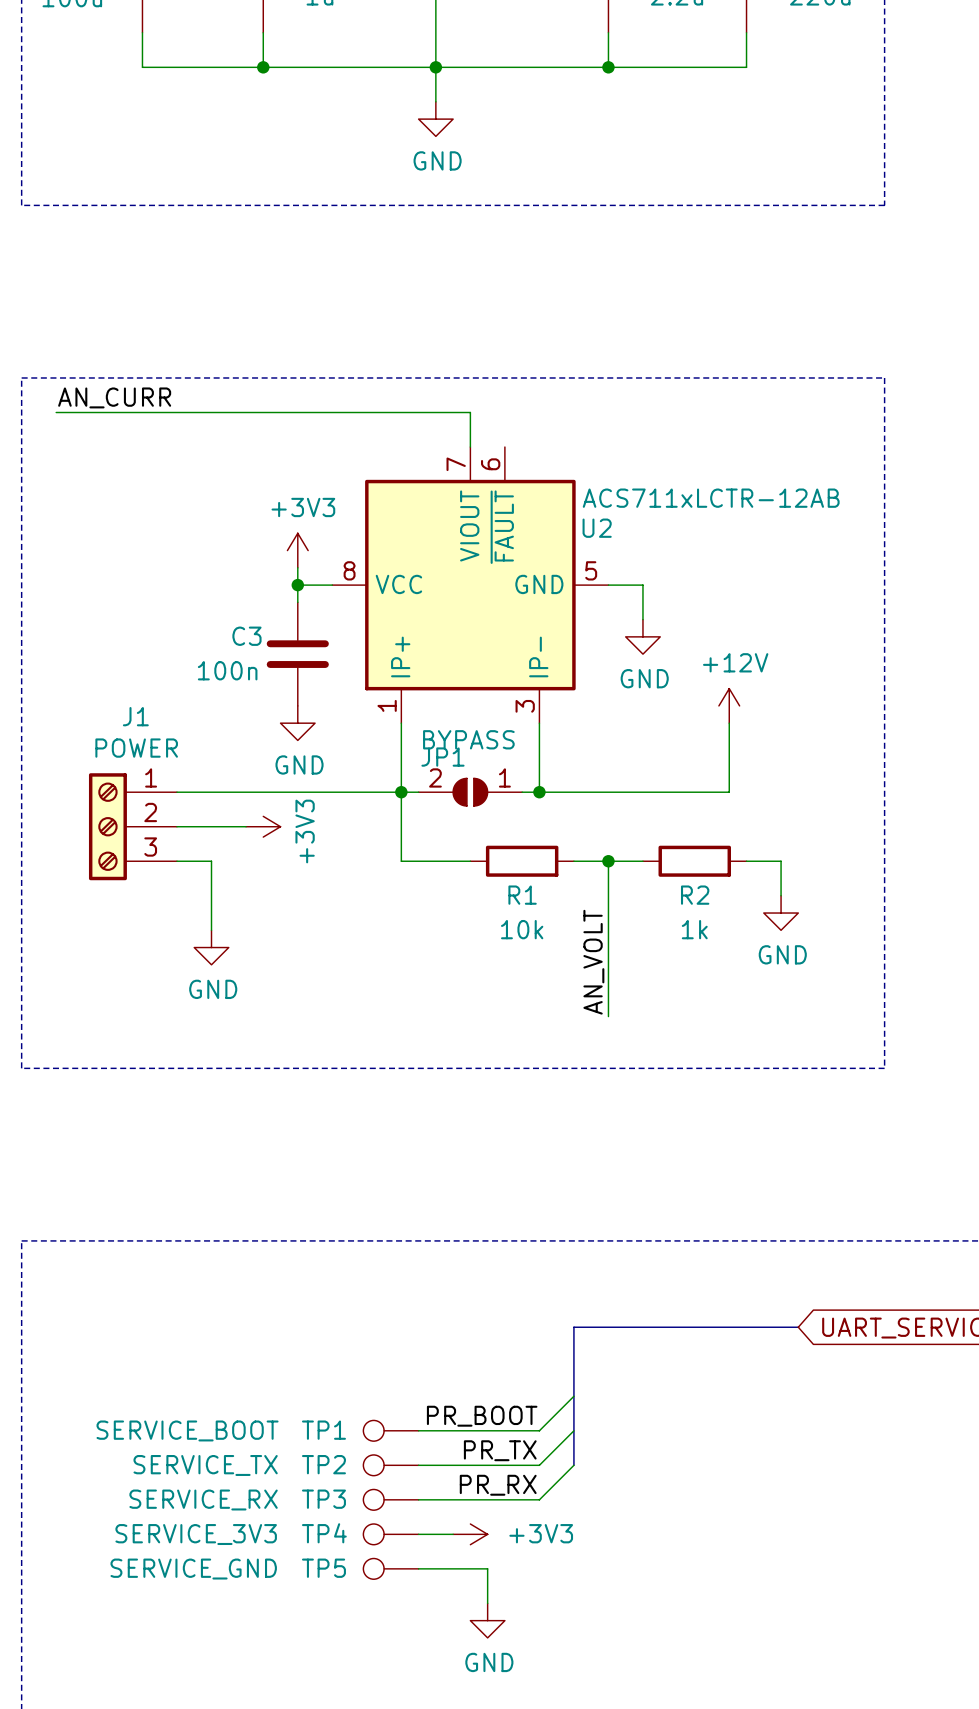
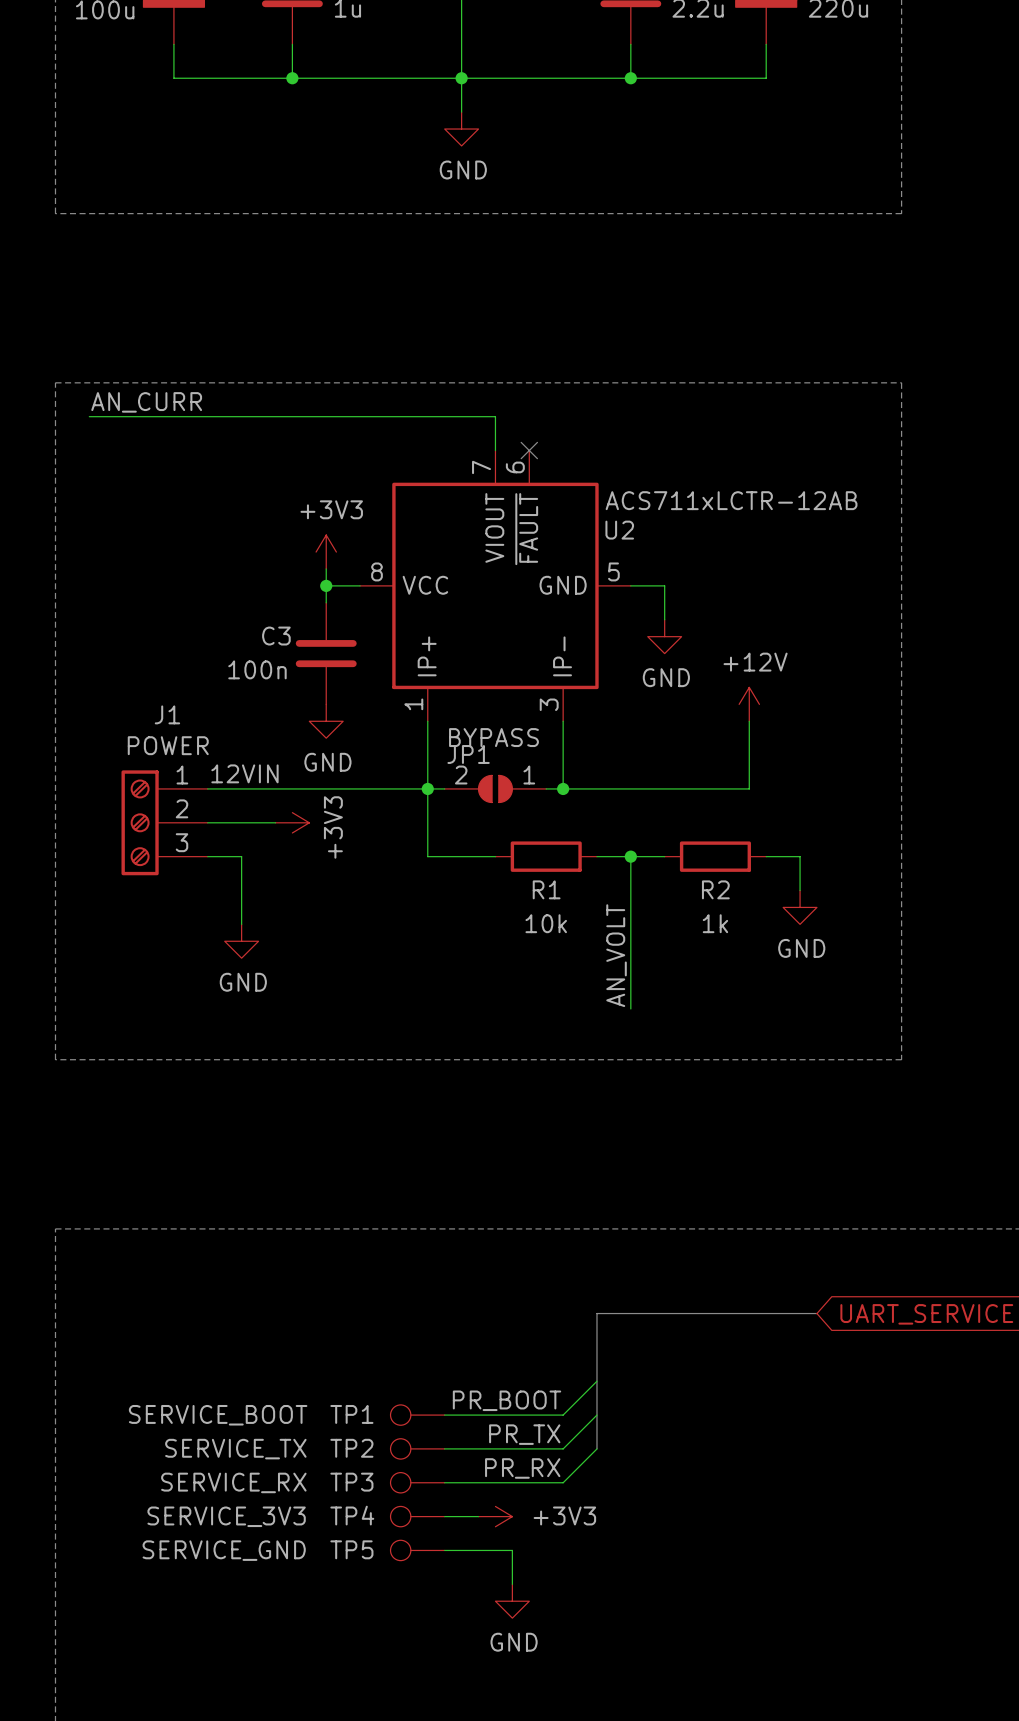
no-connect mark: none -> (529, 450)
label: none -> 12VIN (244, 773)

